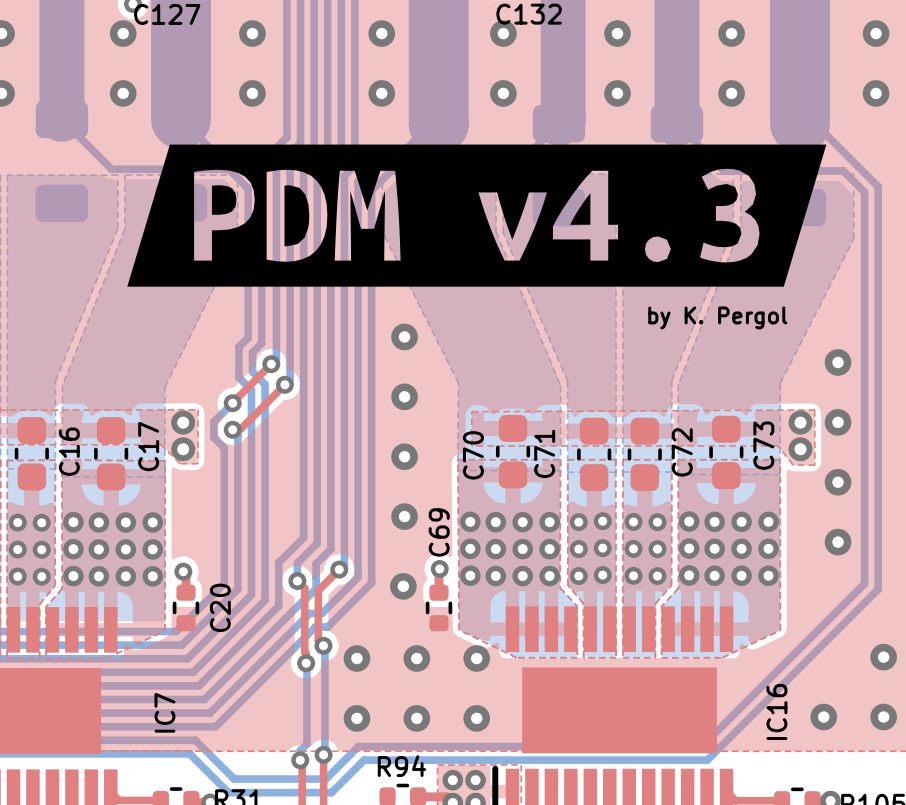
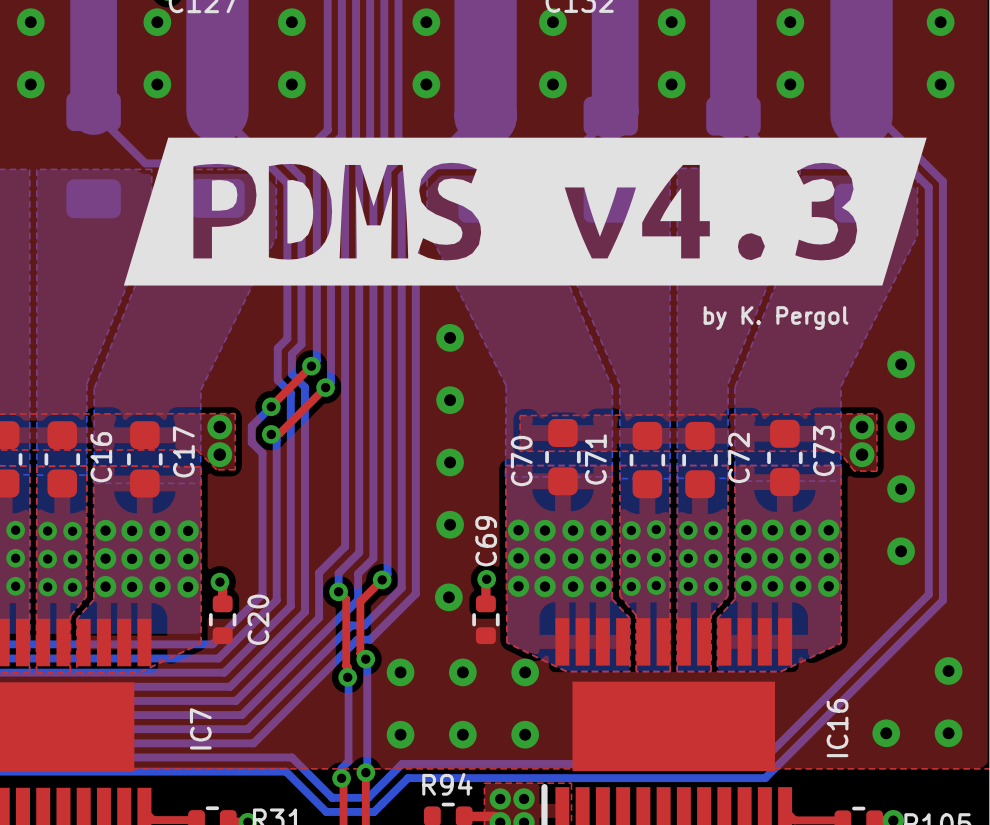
drawing shape: [127, 144, 827, 287] -> [123, 137, 927, 286]
bottom track: (195, 740) (234, 779) (291, 779) -> (232, 757) (291, 757) (332, 797)
bottom track: (189, 753) (228, 792) (285, 792) -> (226, 771) (286, 771) (326, 811)

